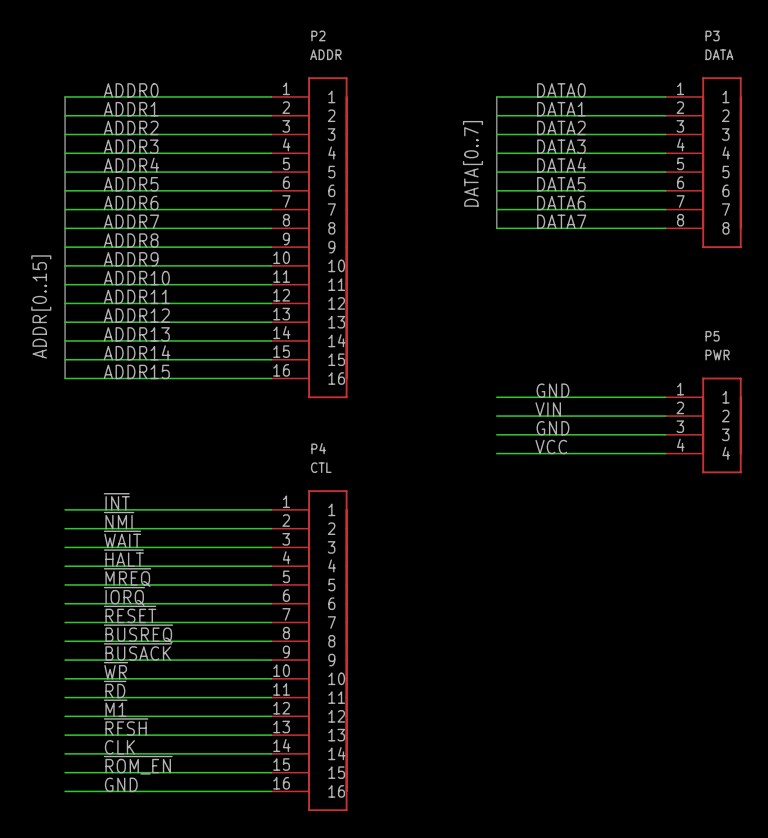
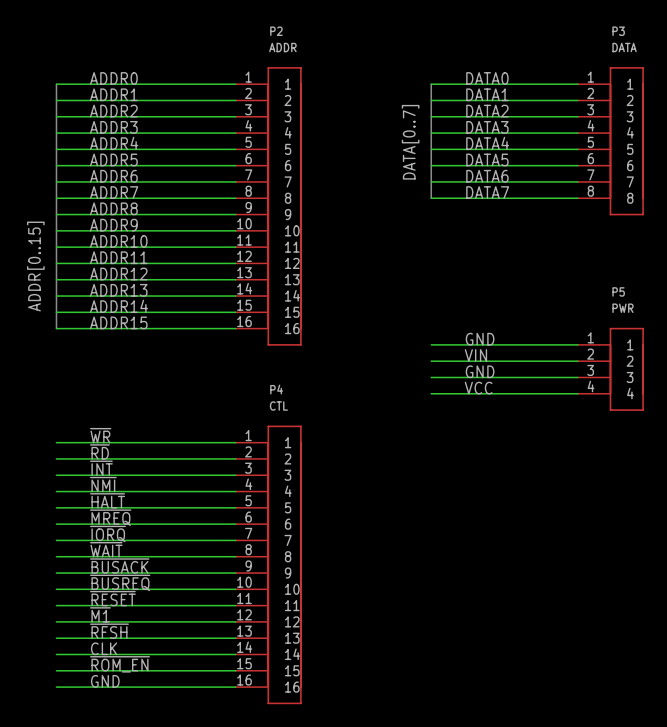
label: ~{INT} (116, 501) -> ~{WR} (100, 435)
label: ~{NMI} (119, 520) -> ~{RD} (99, 451)
label: ~{WAIT} (122, 539) -> ~{INT} (101, 468)
label: ~{HALT} (123, 558) -> ~{NMI} (103, 484)
label: ~{MREQ} (127, 577) -> ~{HALT} (107, 500)
label: ~{IORQ} (124, 596) -> ~{MREQ} (110, 517)
label: ~{RESET} (130, 614) -> ~{IORQ} (108, 533)
label: ~{BUSREQ} (138, 633) -> ~{WAIT} (106, 549)
label: ~{WR} (115, 670) -> ~{BUSREQ} (120, 582)
label: ~{RD} (115, 689) -> ~{RESET} (112, 598)

